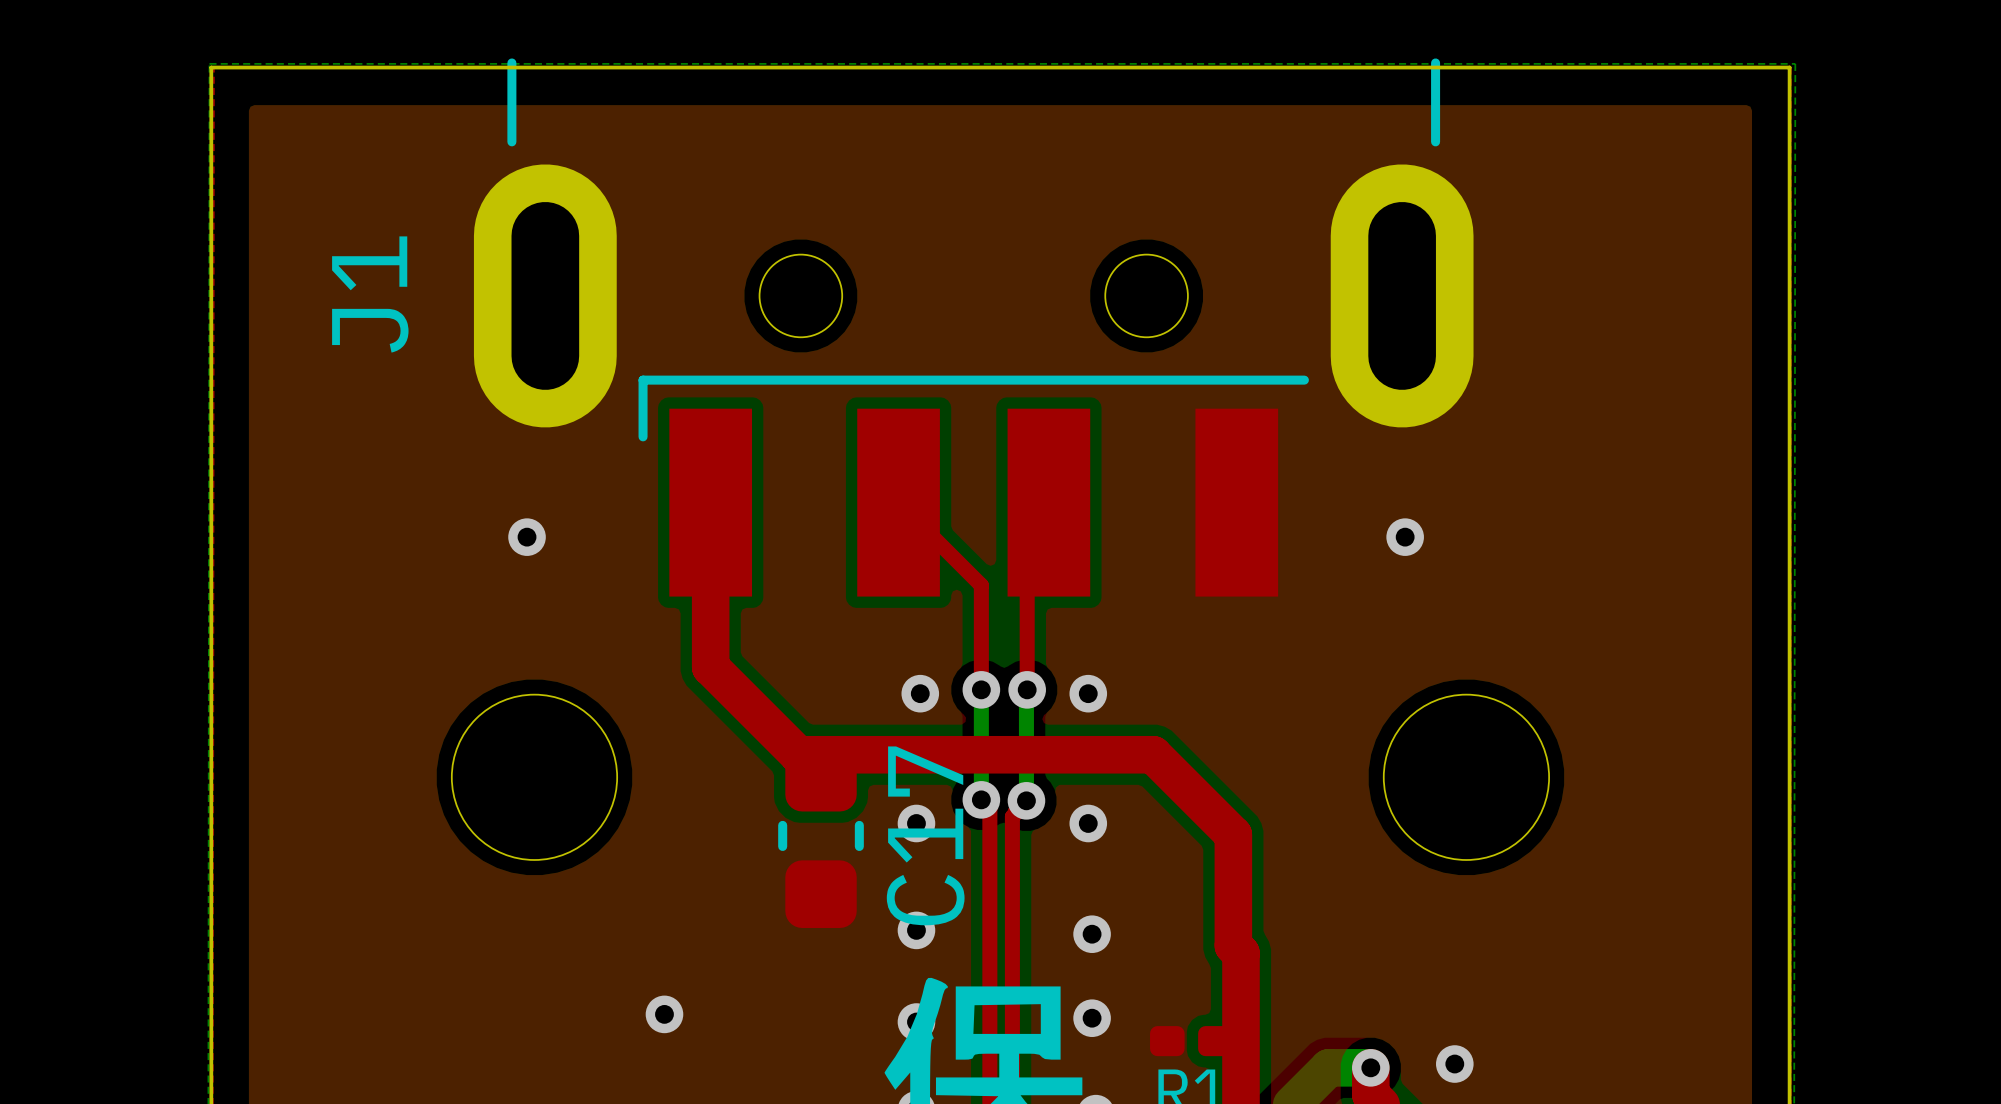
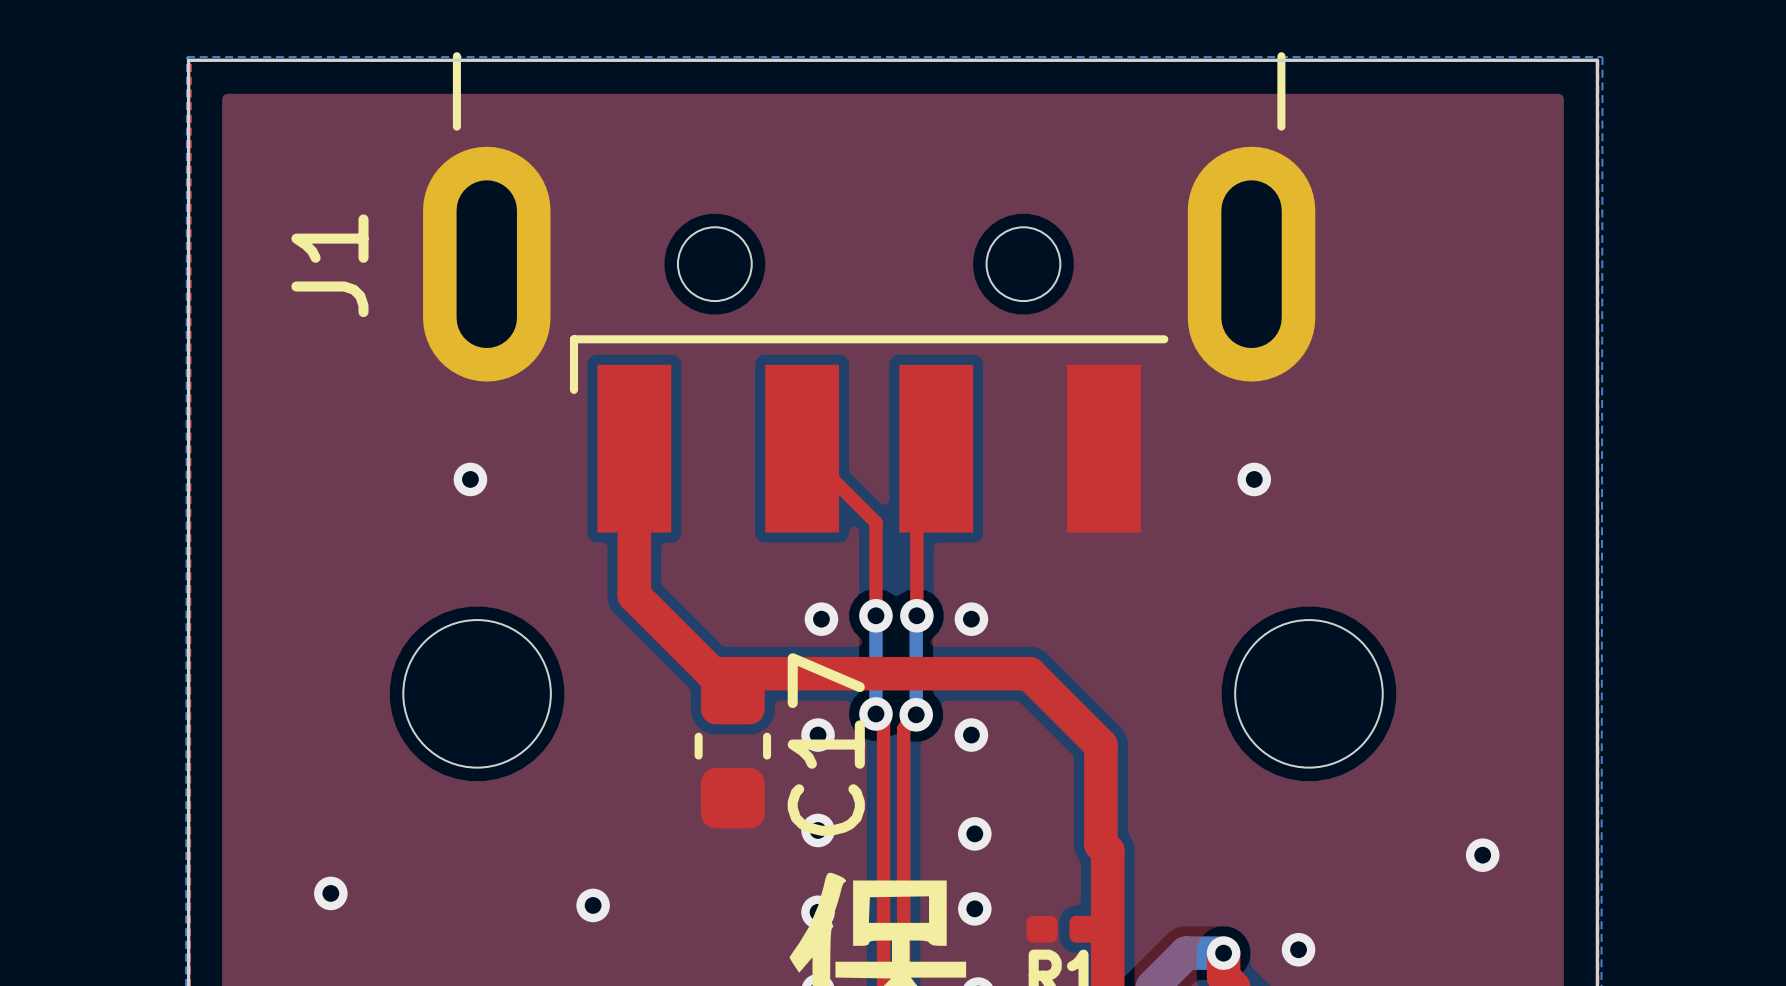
via: none -> (1482, 855)
via: none -> (330, 893)

